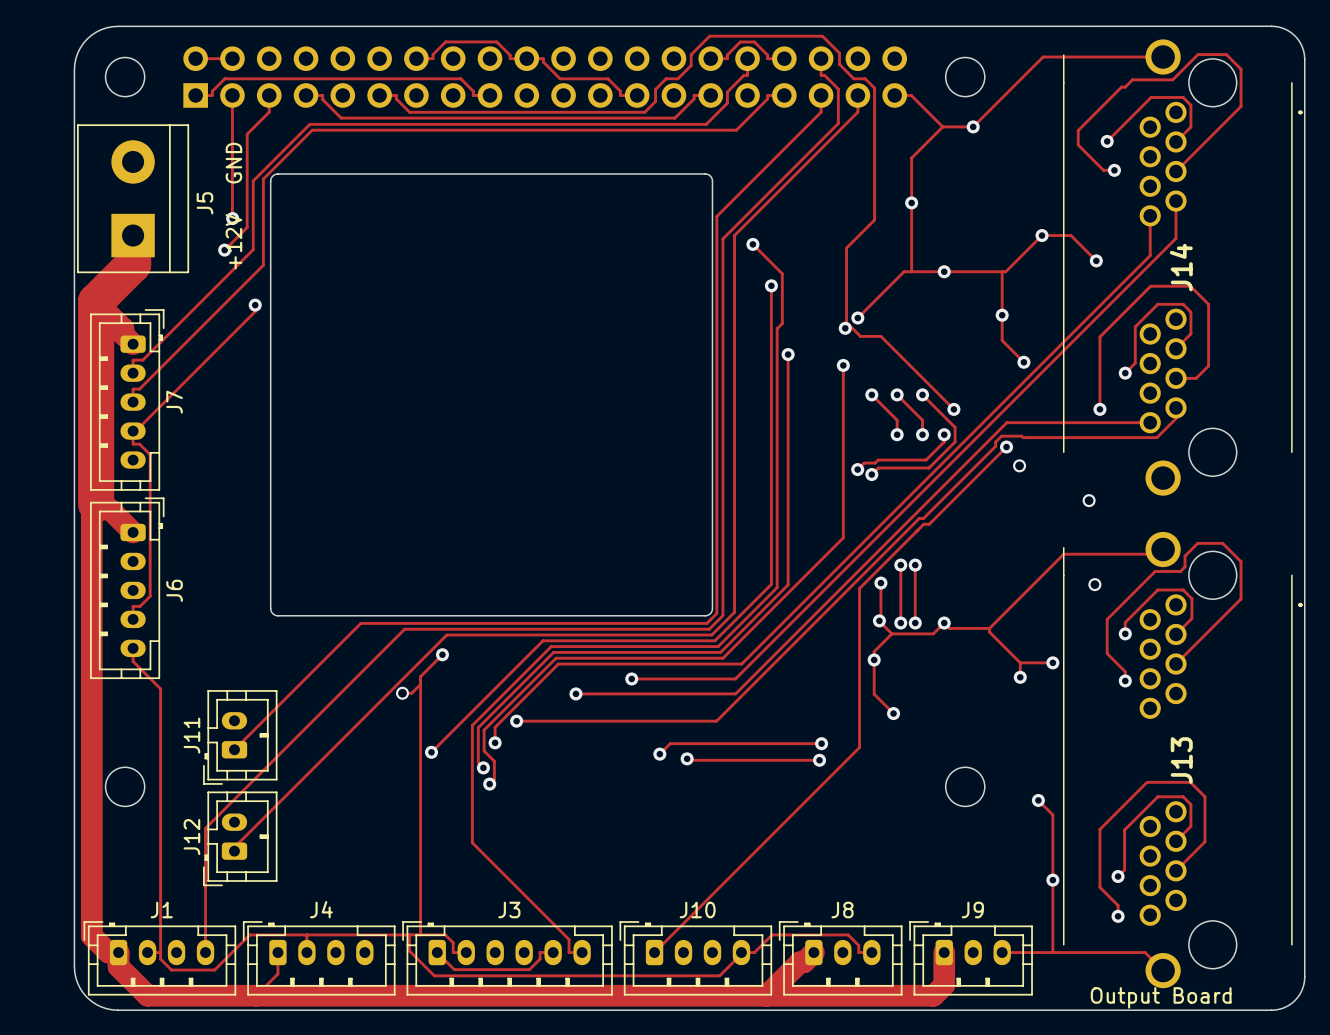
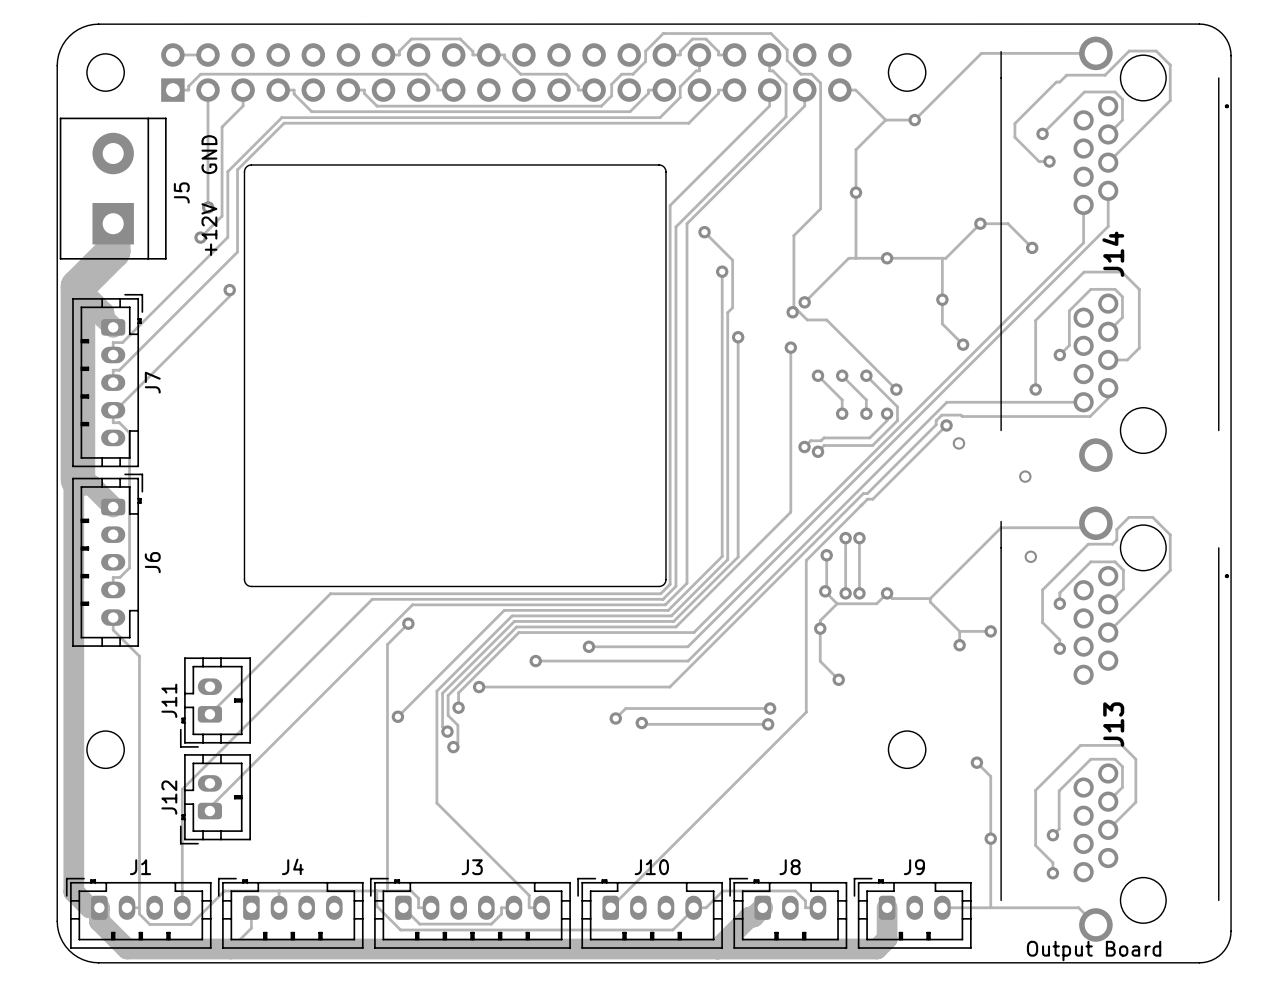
track: (420, 684) (411, 693) (402, 693) -> none
via: (402, 693) -> none

